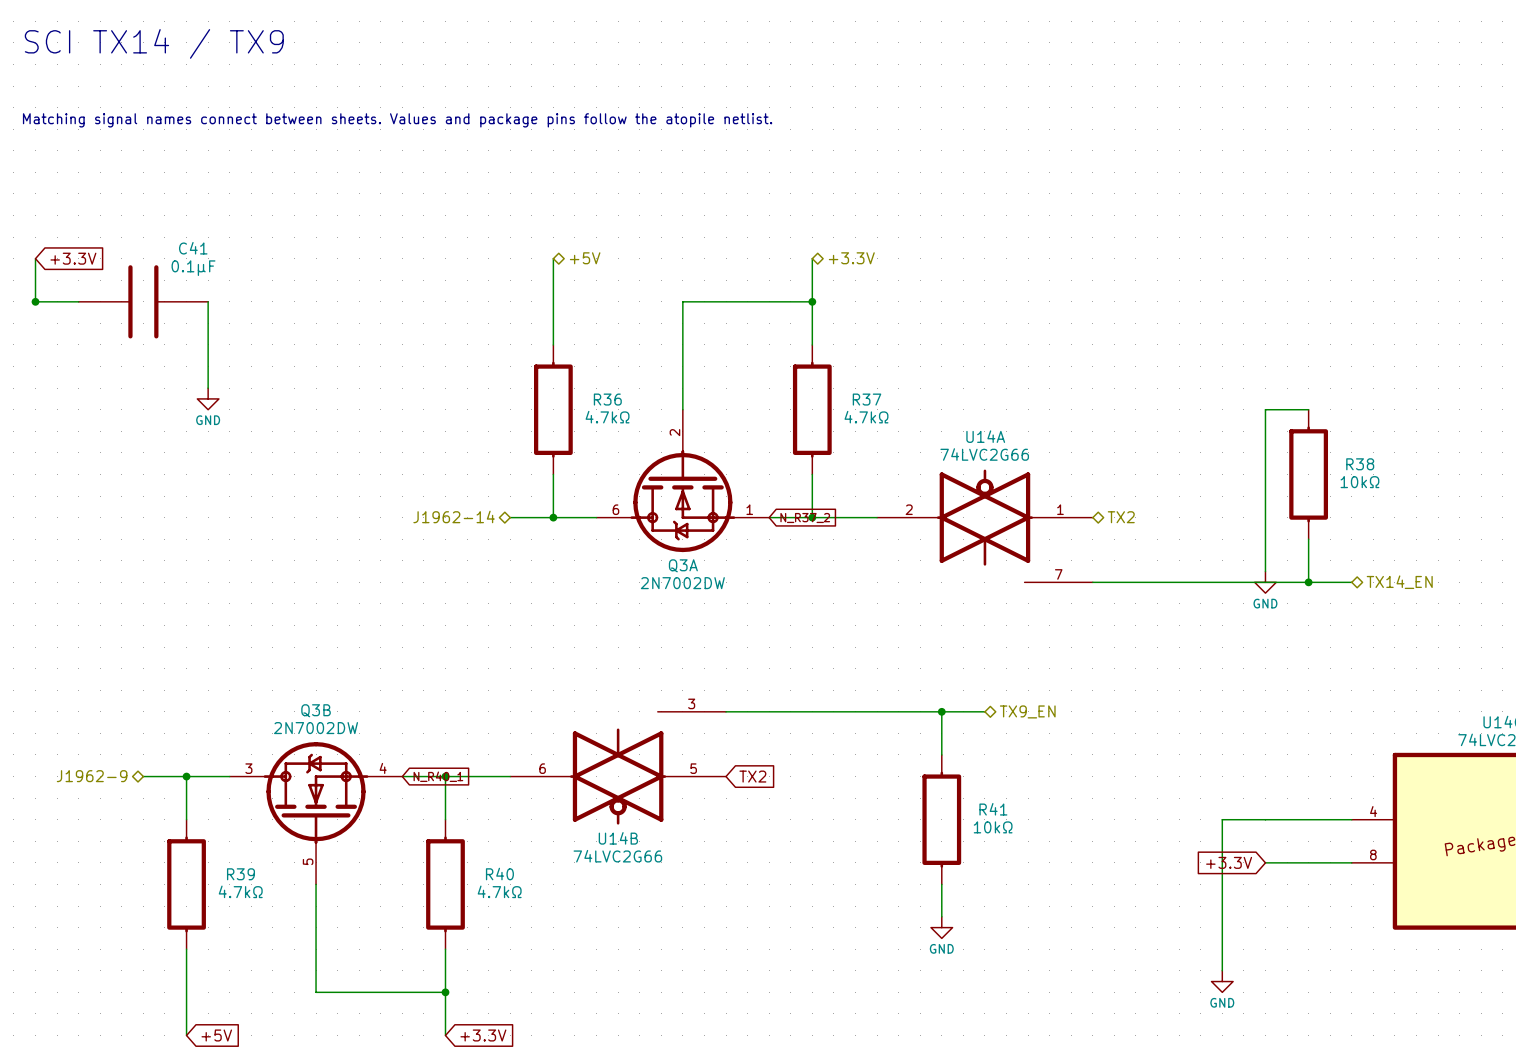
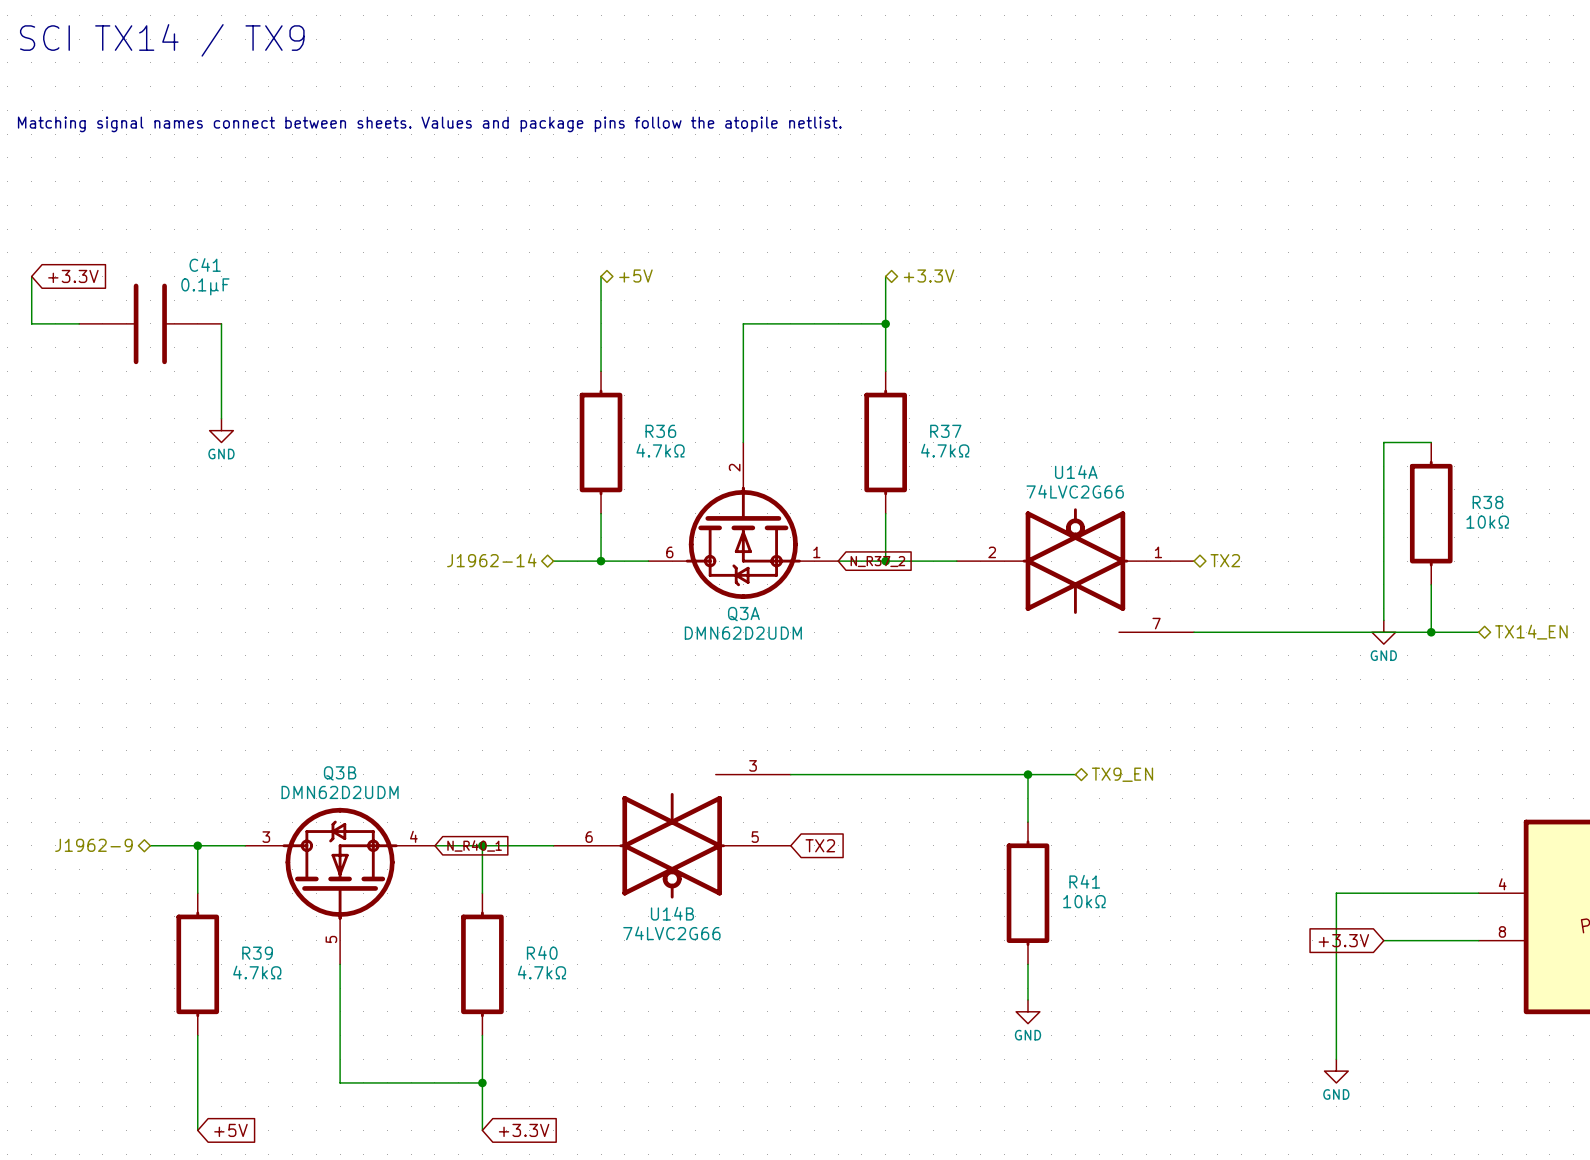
junction: (35, 301) -> none
Q3A value: 2N7002DW (682, 583) -> DMN62D2UDM (743, 633)
Q3B value: 2N7002DW (316, 728) -> DMN62D2UDM (340, 792)

